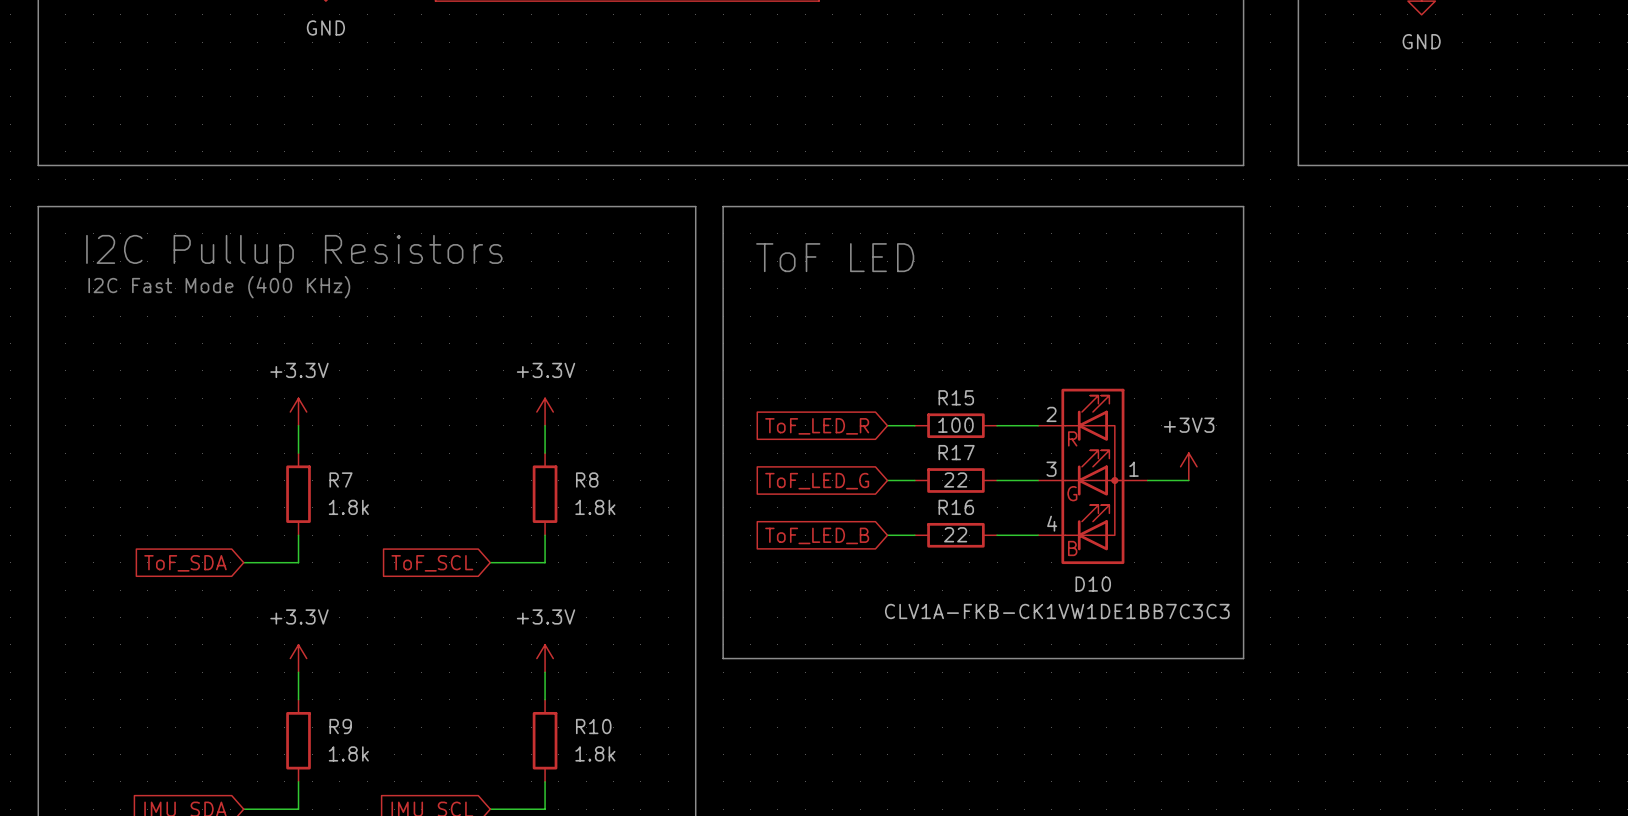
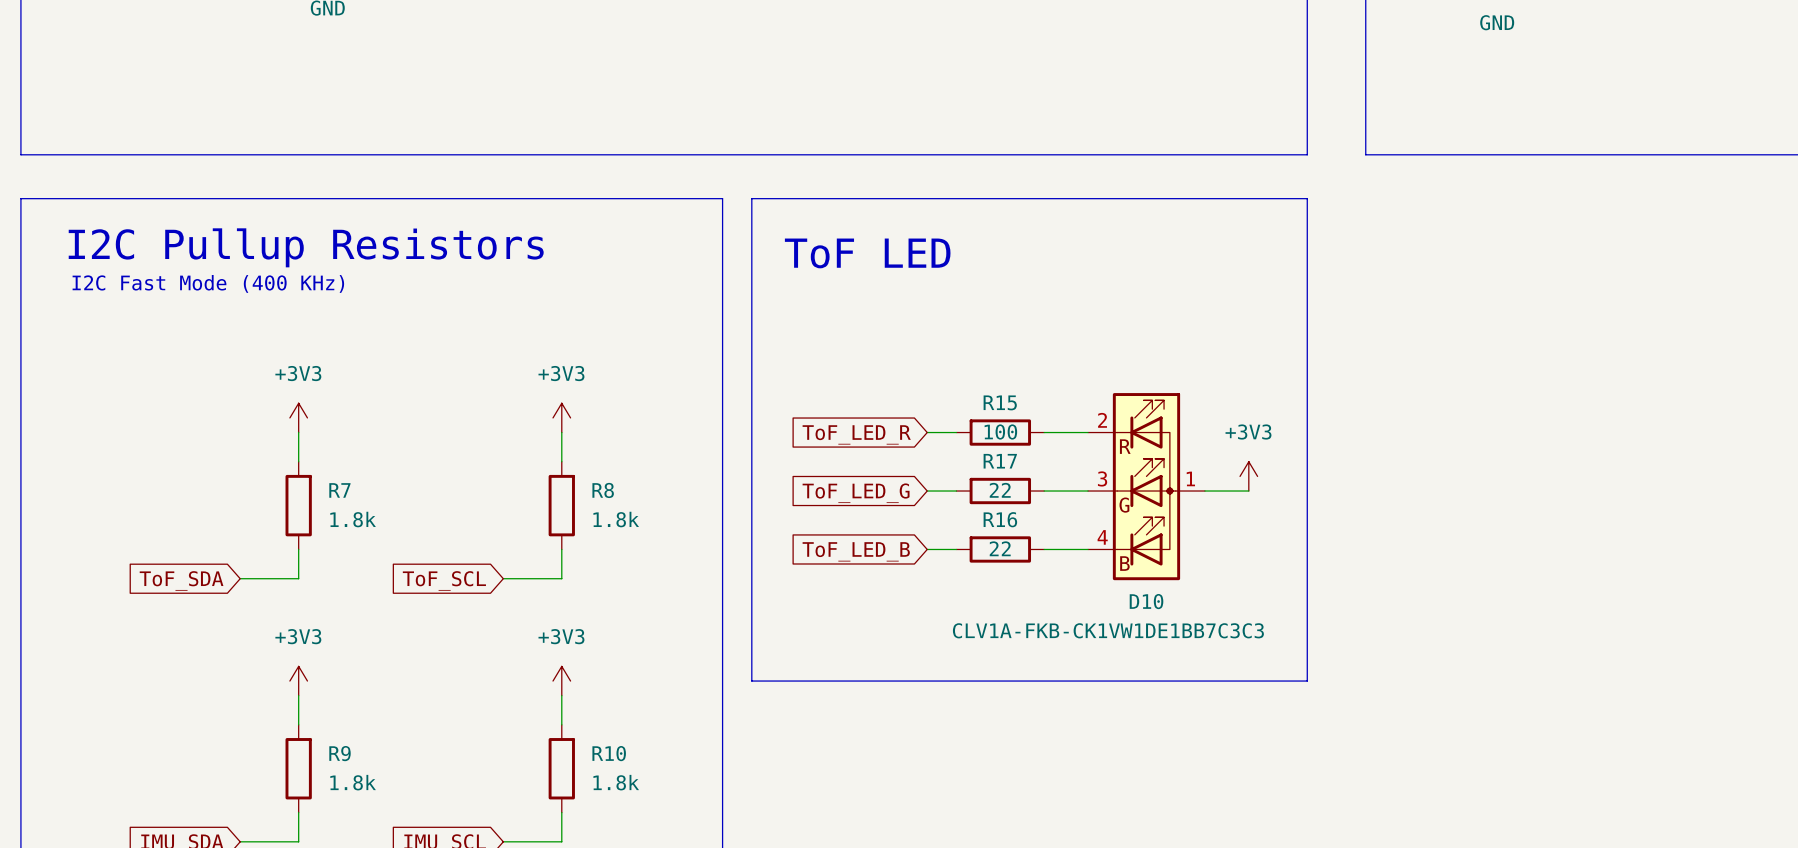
power symbol: +3.3V (298, 412) -> +3V3 (298, 417)
power symbol: +3.3V (545, 412) -> +3V3 (561, 417)
power symbol: +3.3V (298, 658) -> +3V3 (298, 681)
power symbol: +3.3V (545, 658) -> +3V3 (561, 681)

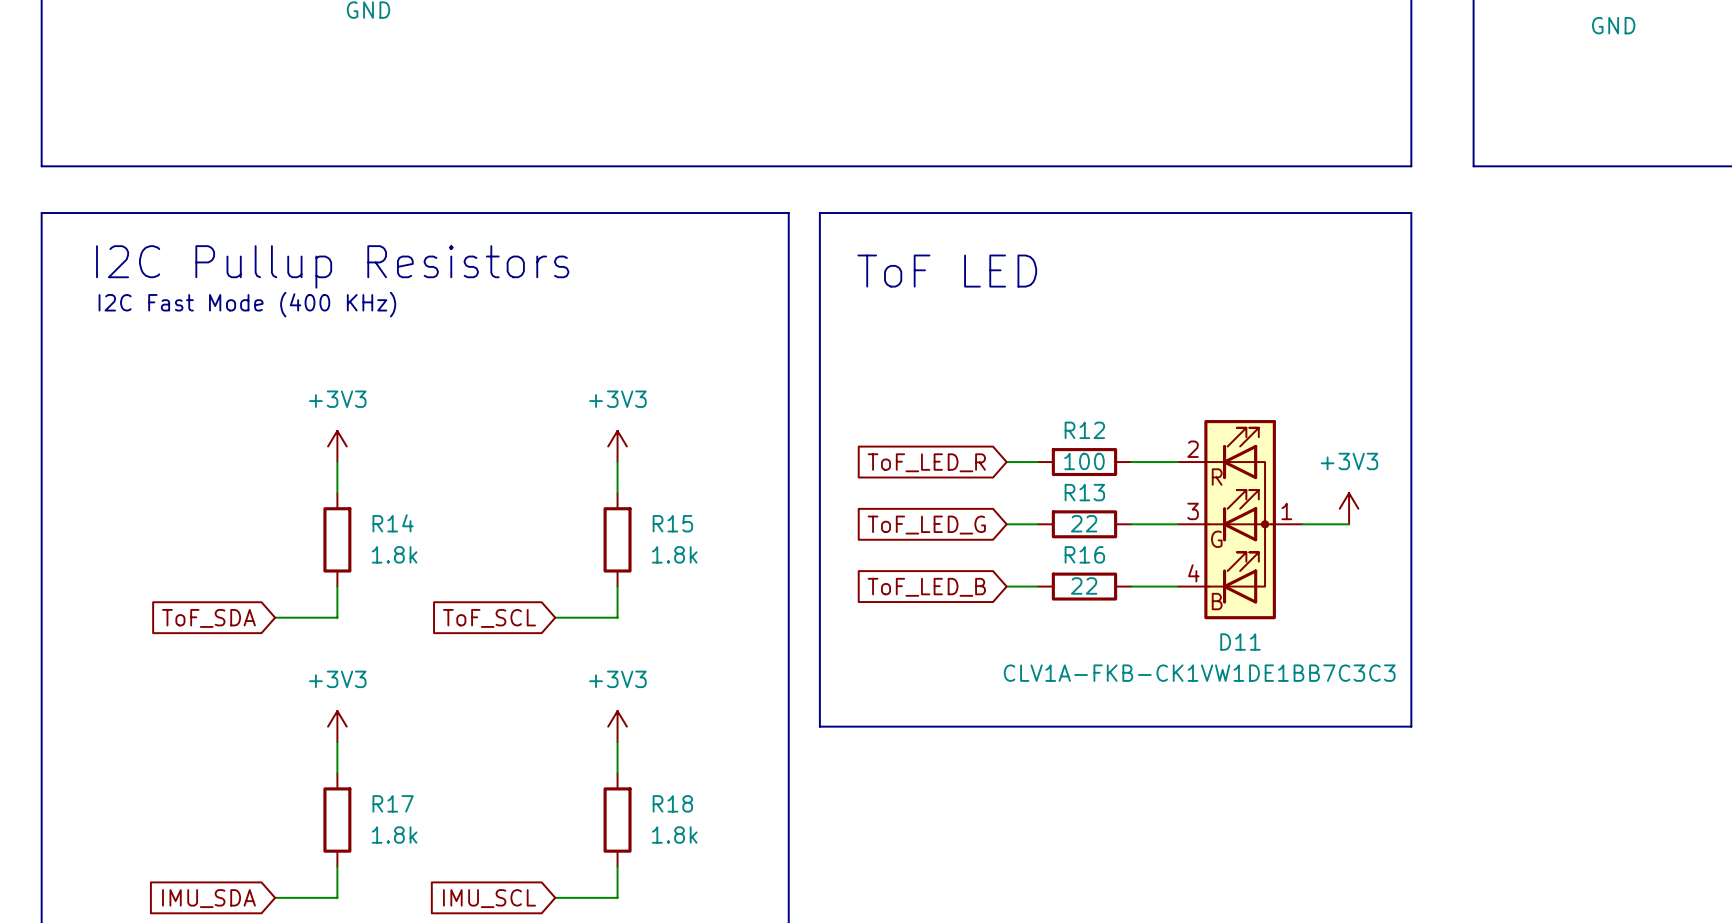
R15 name: R15 (1000, 402) -> R12 (1084, 430)
R17 name: R17 (1000, 461) -> R13 (1084, 492)
R7 name: R7 (339, 490) -> R14 (393, 523)
R8 name: R8 (603, 490) -> R15 (672, 523)
D10 name: D10 (1146, 601) -> D11 (1240, 642)
R9 name: R9 (340, 753) -> R17 (393, 803)
R10 name: R10 (609, 753) -> R18 (672, 803)

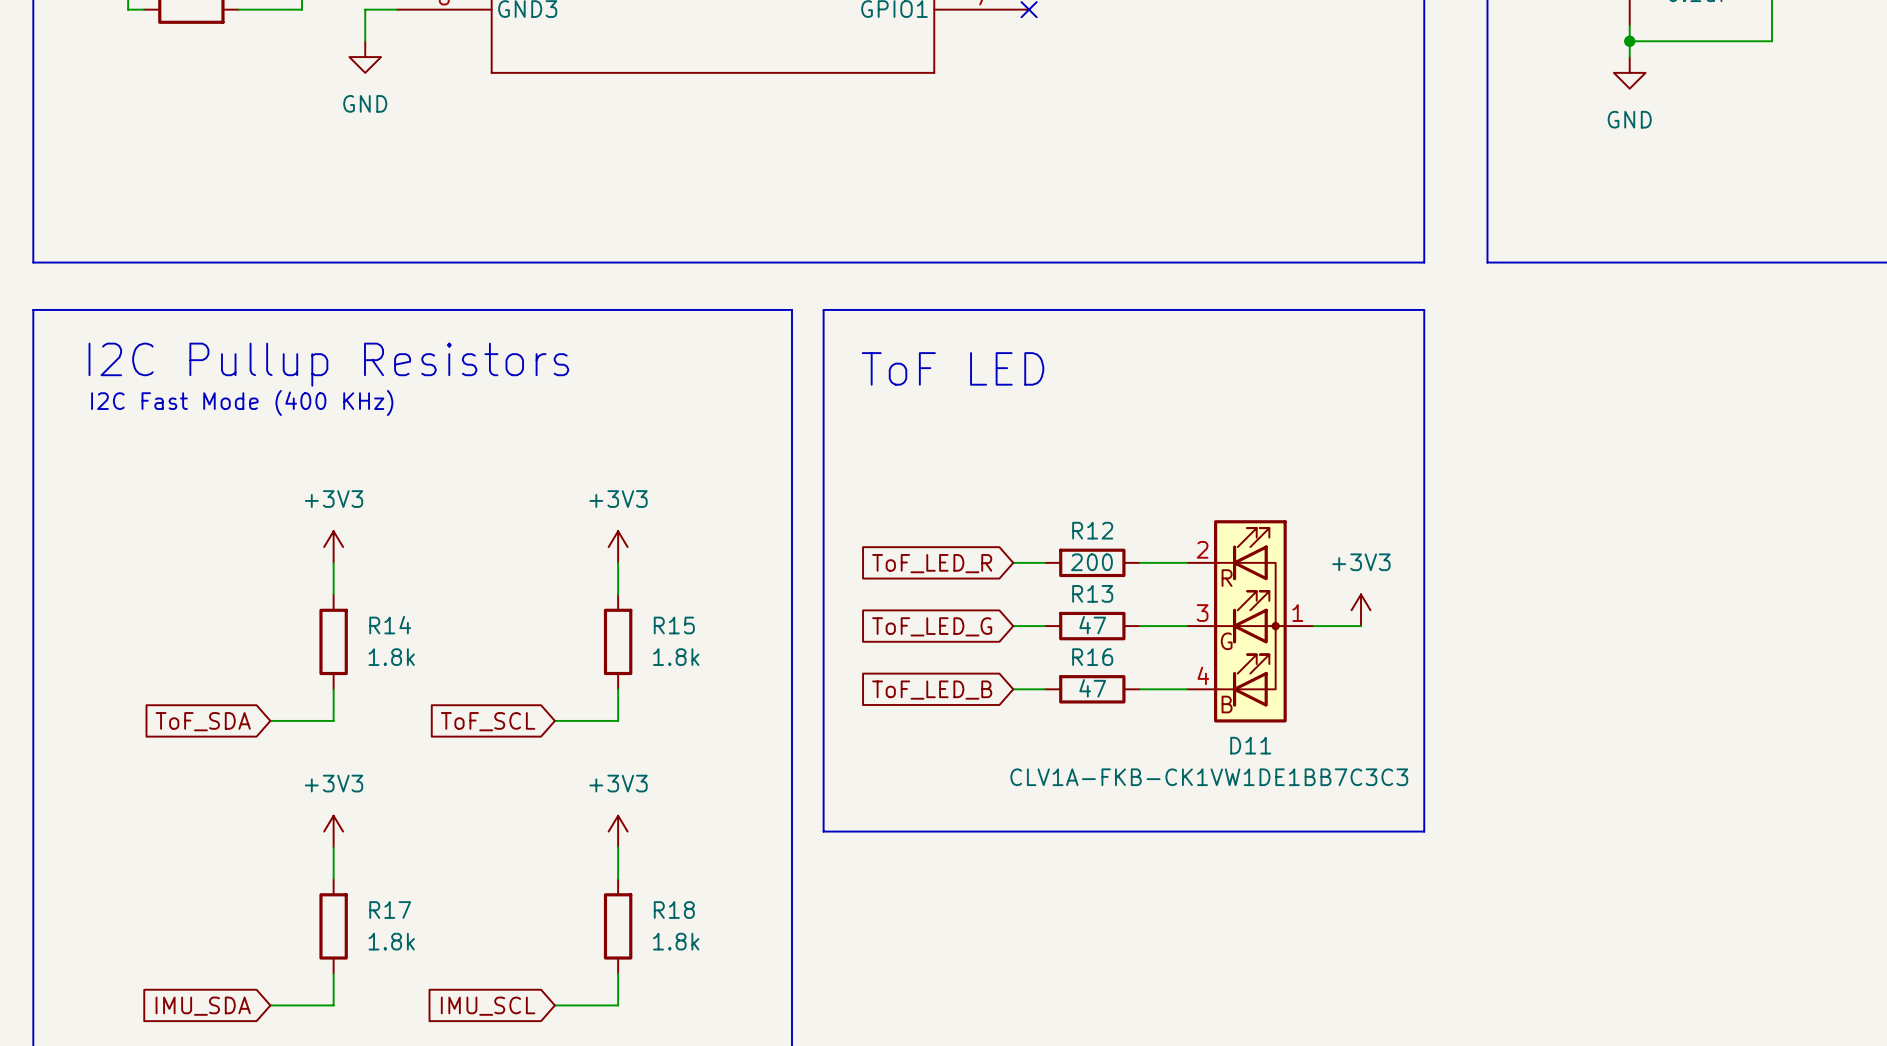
R12 value: 100 (1084, 461) -> 200 (1091, 562)
R13 value: 22 (1084, 523) -> 47 (1092, 625)
R16 value: 22 (1084, 585) -> 47 (1092, 688)

